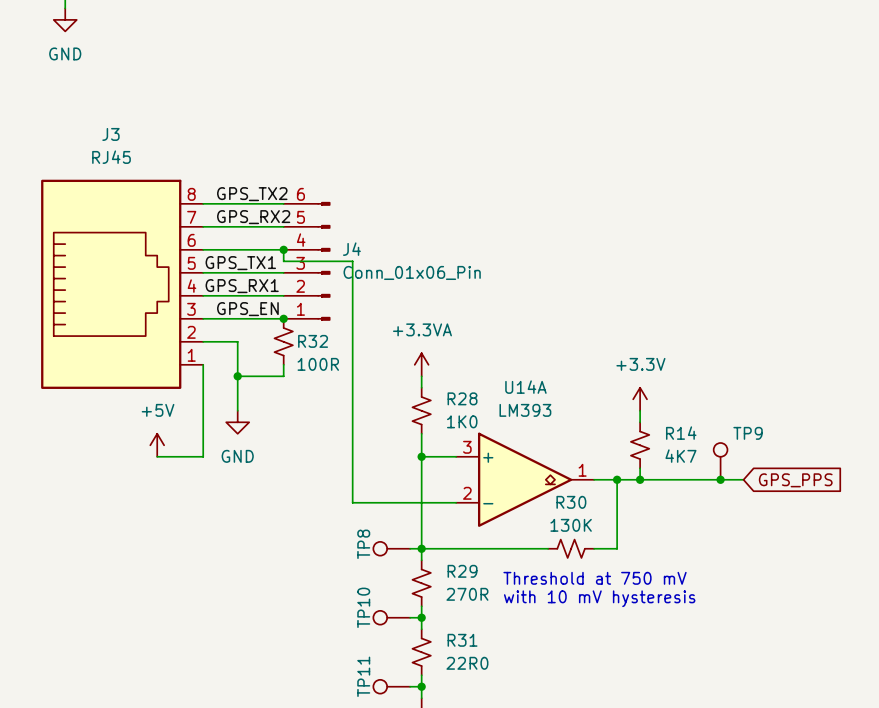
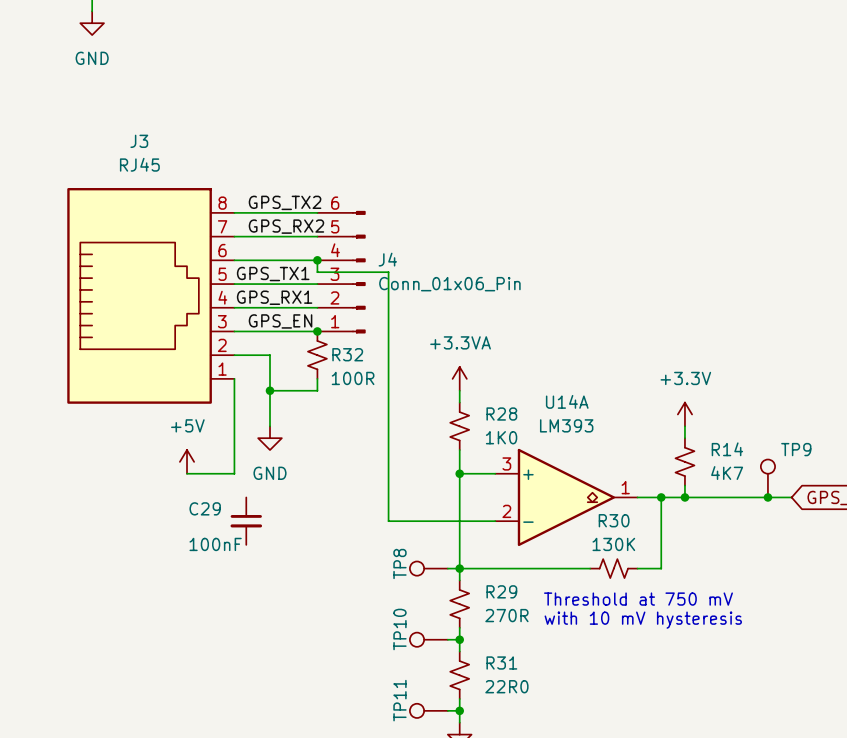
C29: none -> 100nF (246, 521)

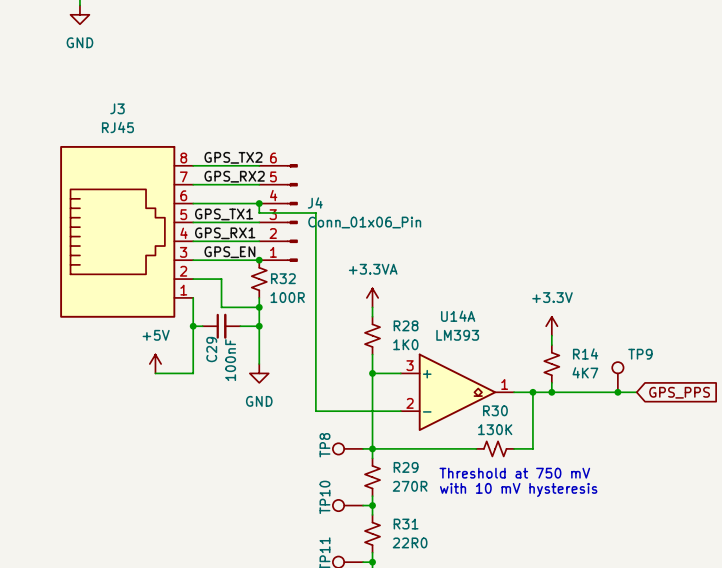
wire: (270, 390) (270, 426) -> none
junction: (270, 390) -> none
wire: none -> (259, 307) (259, 363)
junction: none -> (259, 307)
wire: none -> (193, 326) (202, 326)
junction: none -> (193, 326)
wire: none -> (240, 326) (259, 326)
junction: none -> (259, 326)
power symbol position: GND (270, 438) -> GND (259, 373)
C29 rotation: 0° (246, 521) -> 90° counterclockwise (221, 326)
C29 position: (246, 521) -> (221, 326)

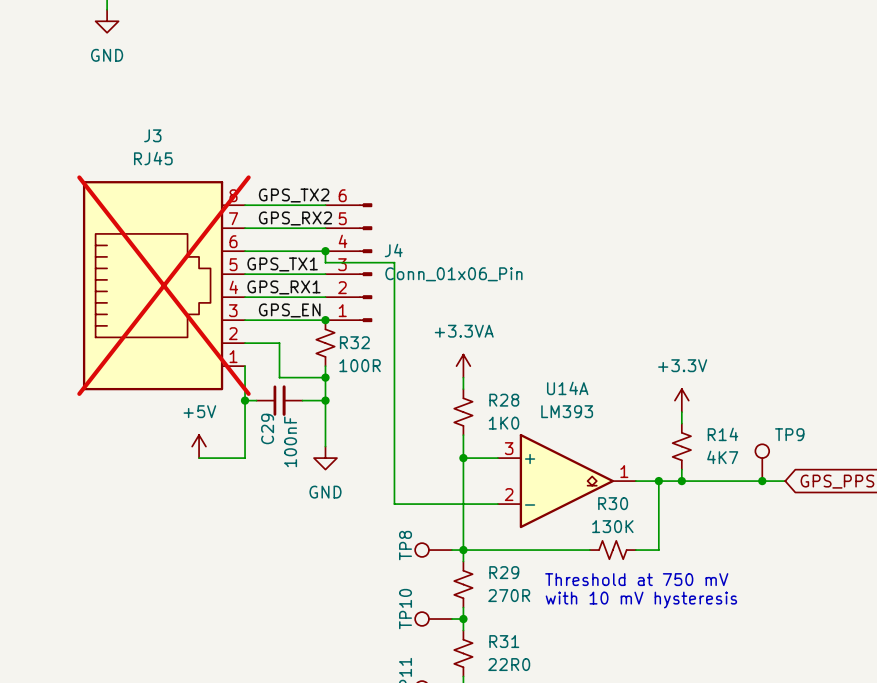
J3 do-not-place cross: none -> (163, 285)

